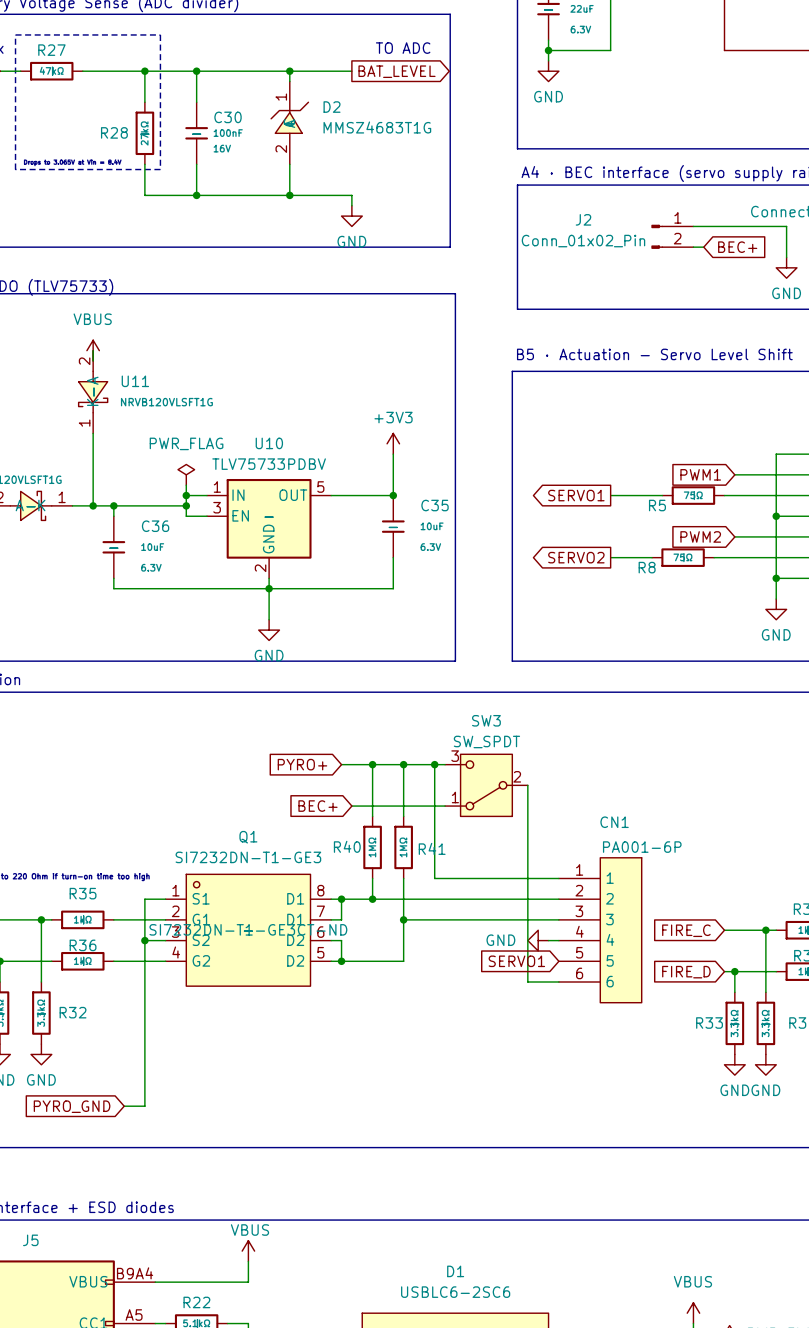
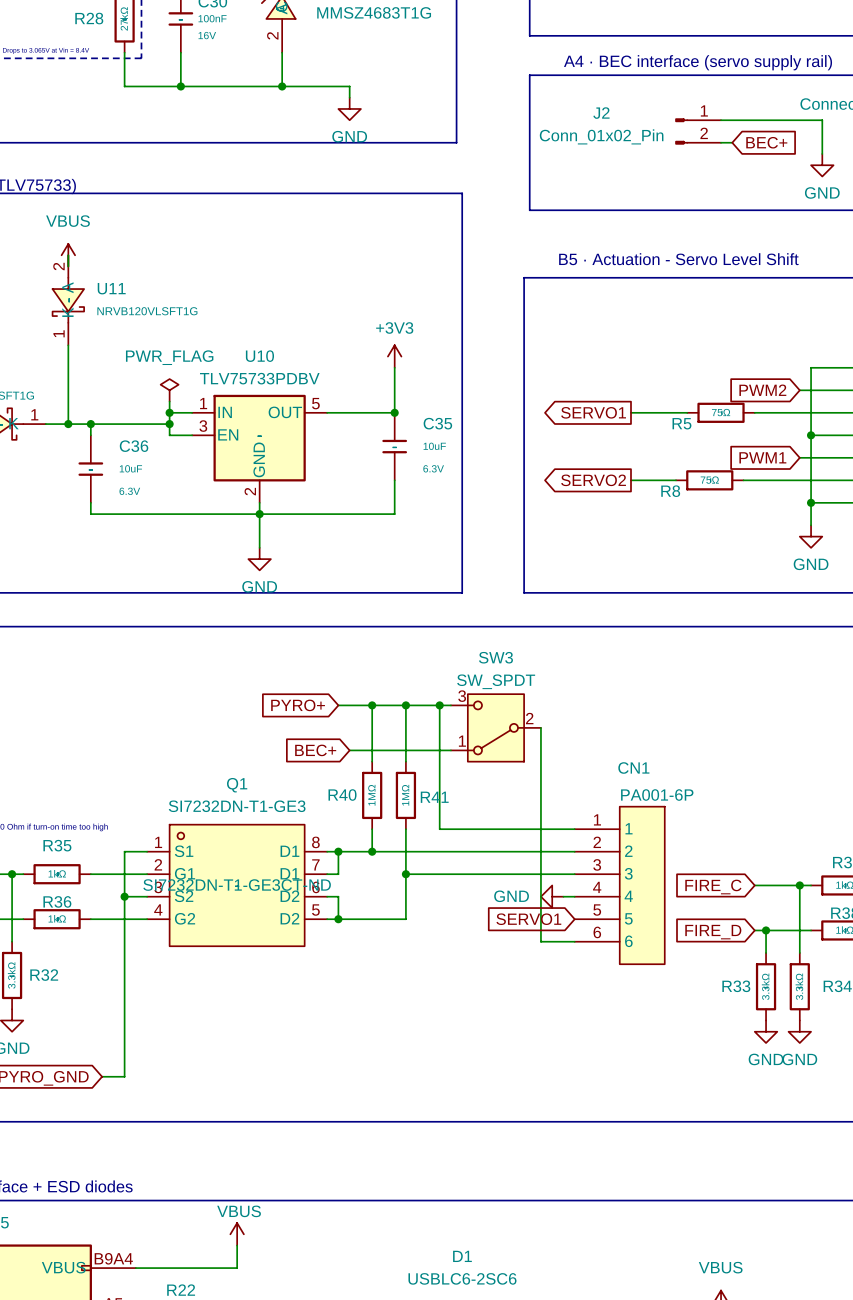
global label position: PWM1 (700, 474) -> PWM1 (762, 457)
wire: (734, 474) (765, 474) -> none
global label position: PWM2 (700, 536) -> PWM2 (762, 390)
wire: (734, 536) (765, 536) -> none

